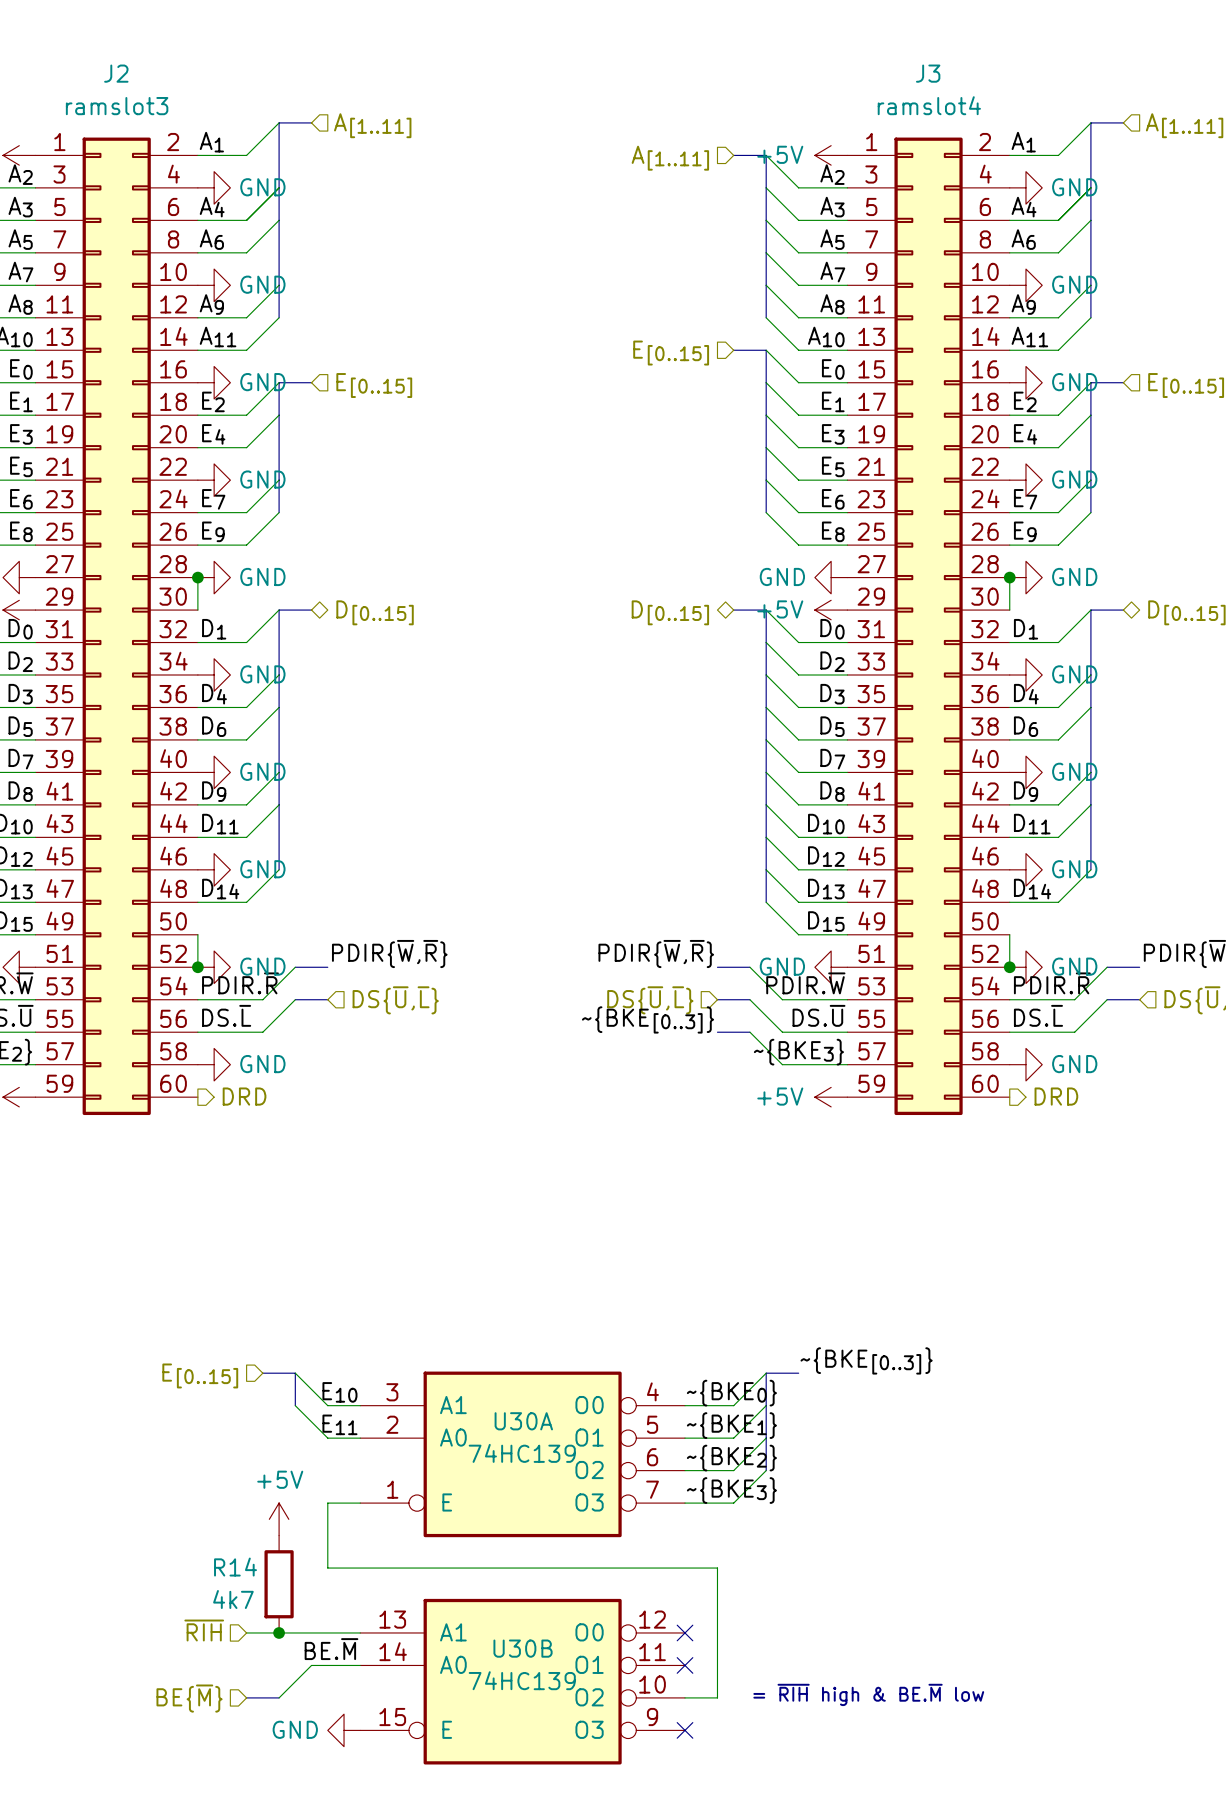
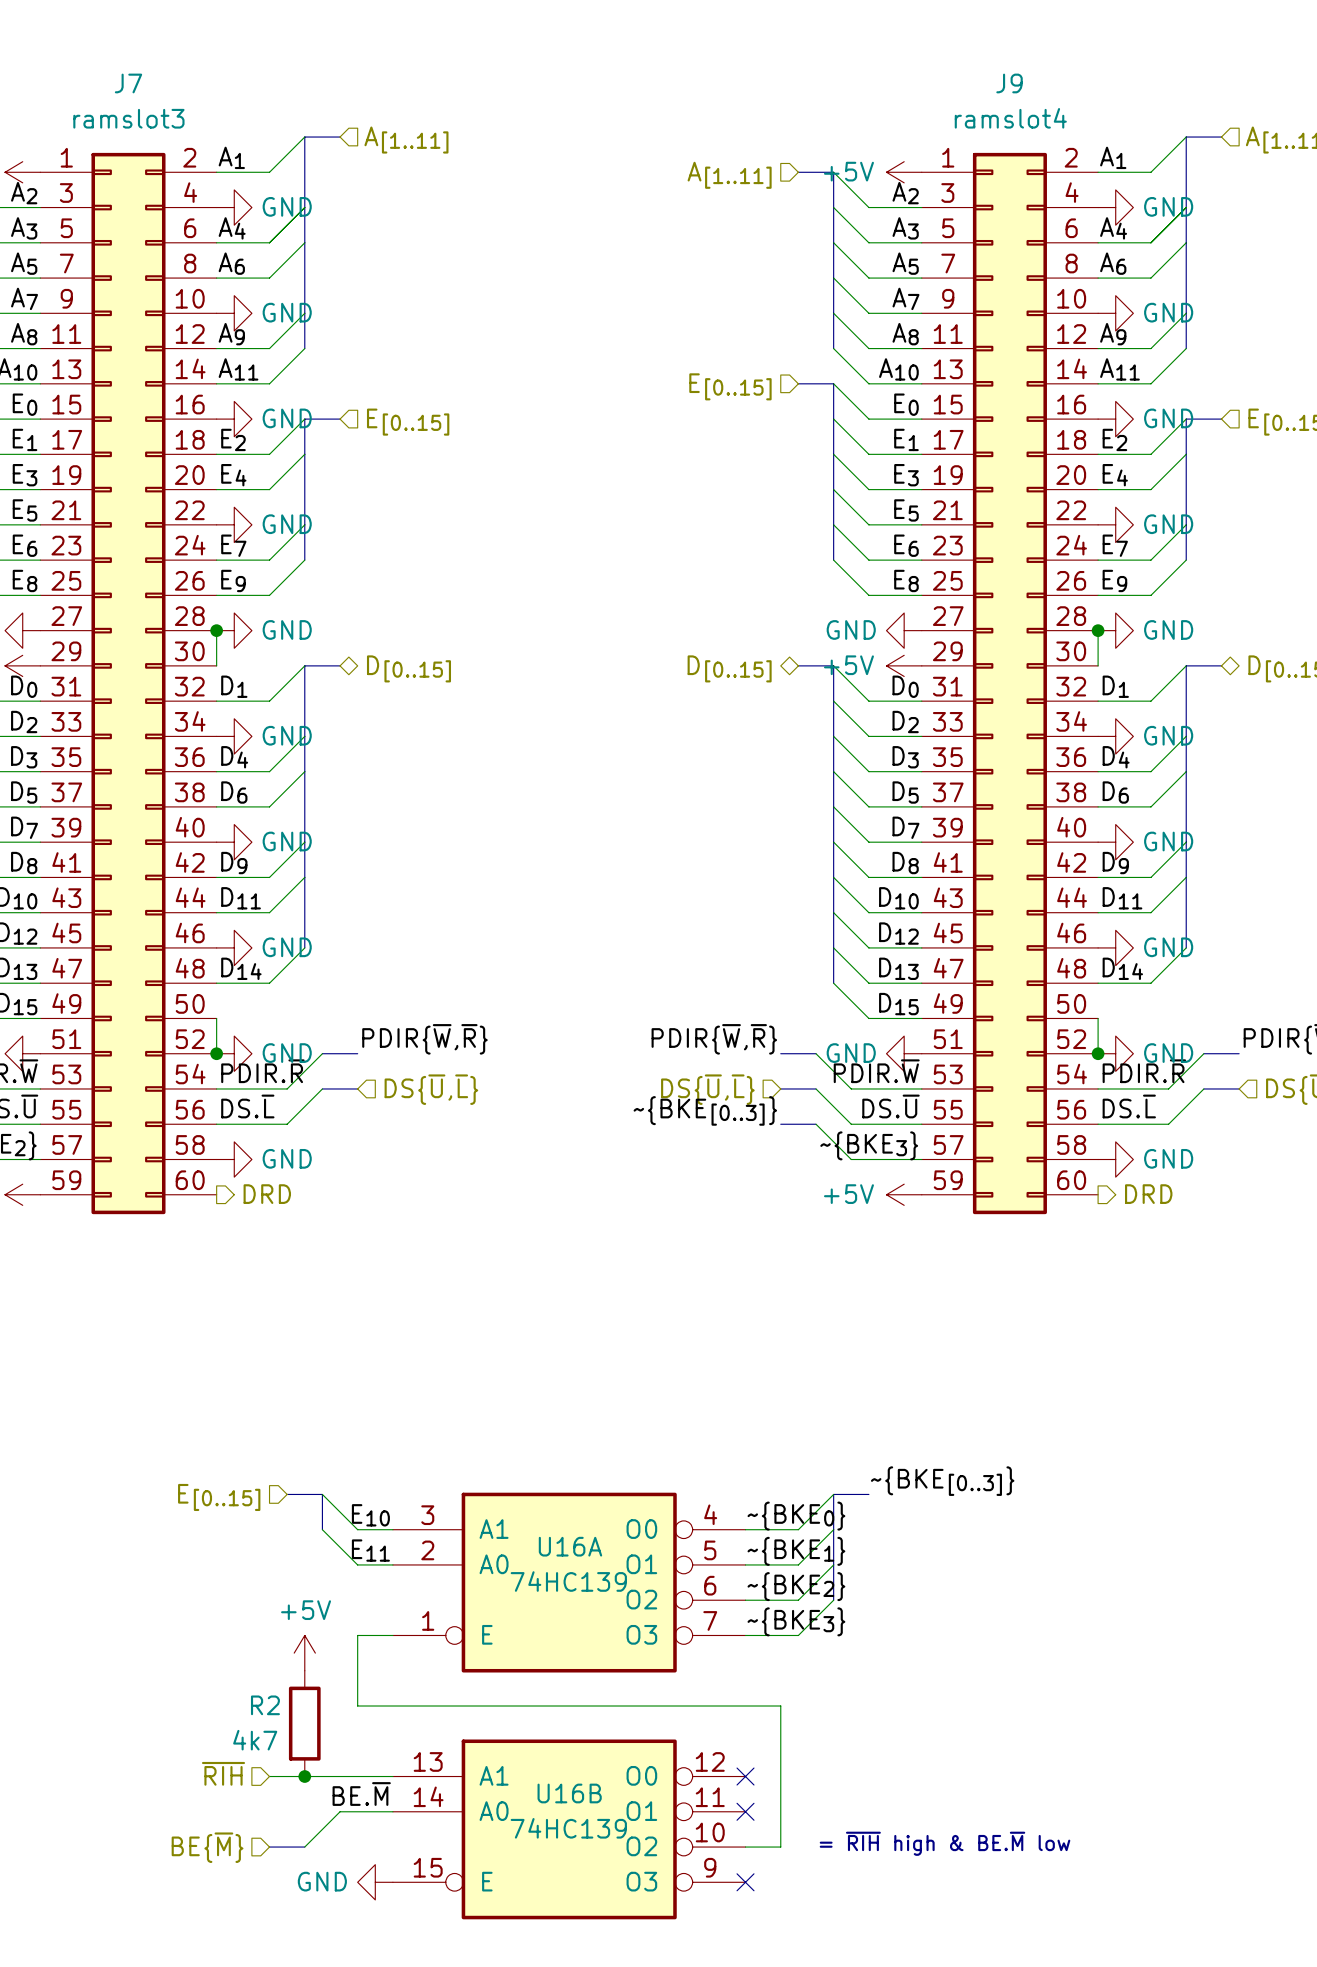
J2 name: J2 (116, 73) -> J7 (128, 83)
J3 name: J3 (928, 73) -> J9 (1009, 83)
U30A name: U30A (523, 1421) -> U16A (570, 1546)
R14 name: R14 (235, 1567) -> R2 (265, 1705)
U30B name: U30B (523, 1648) -> U16B (569, 1793)

